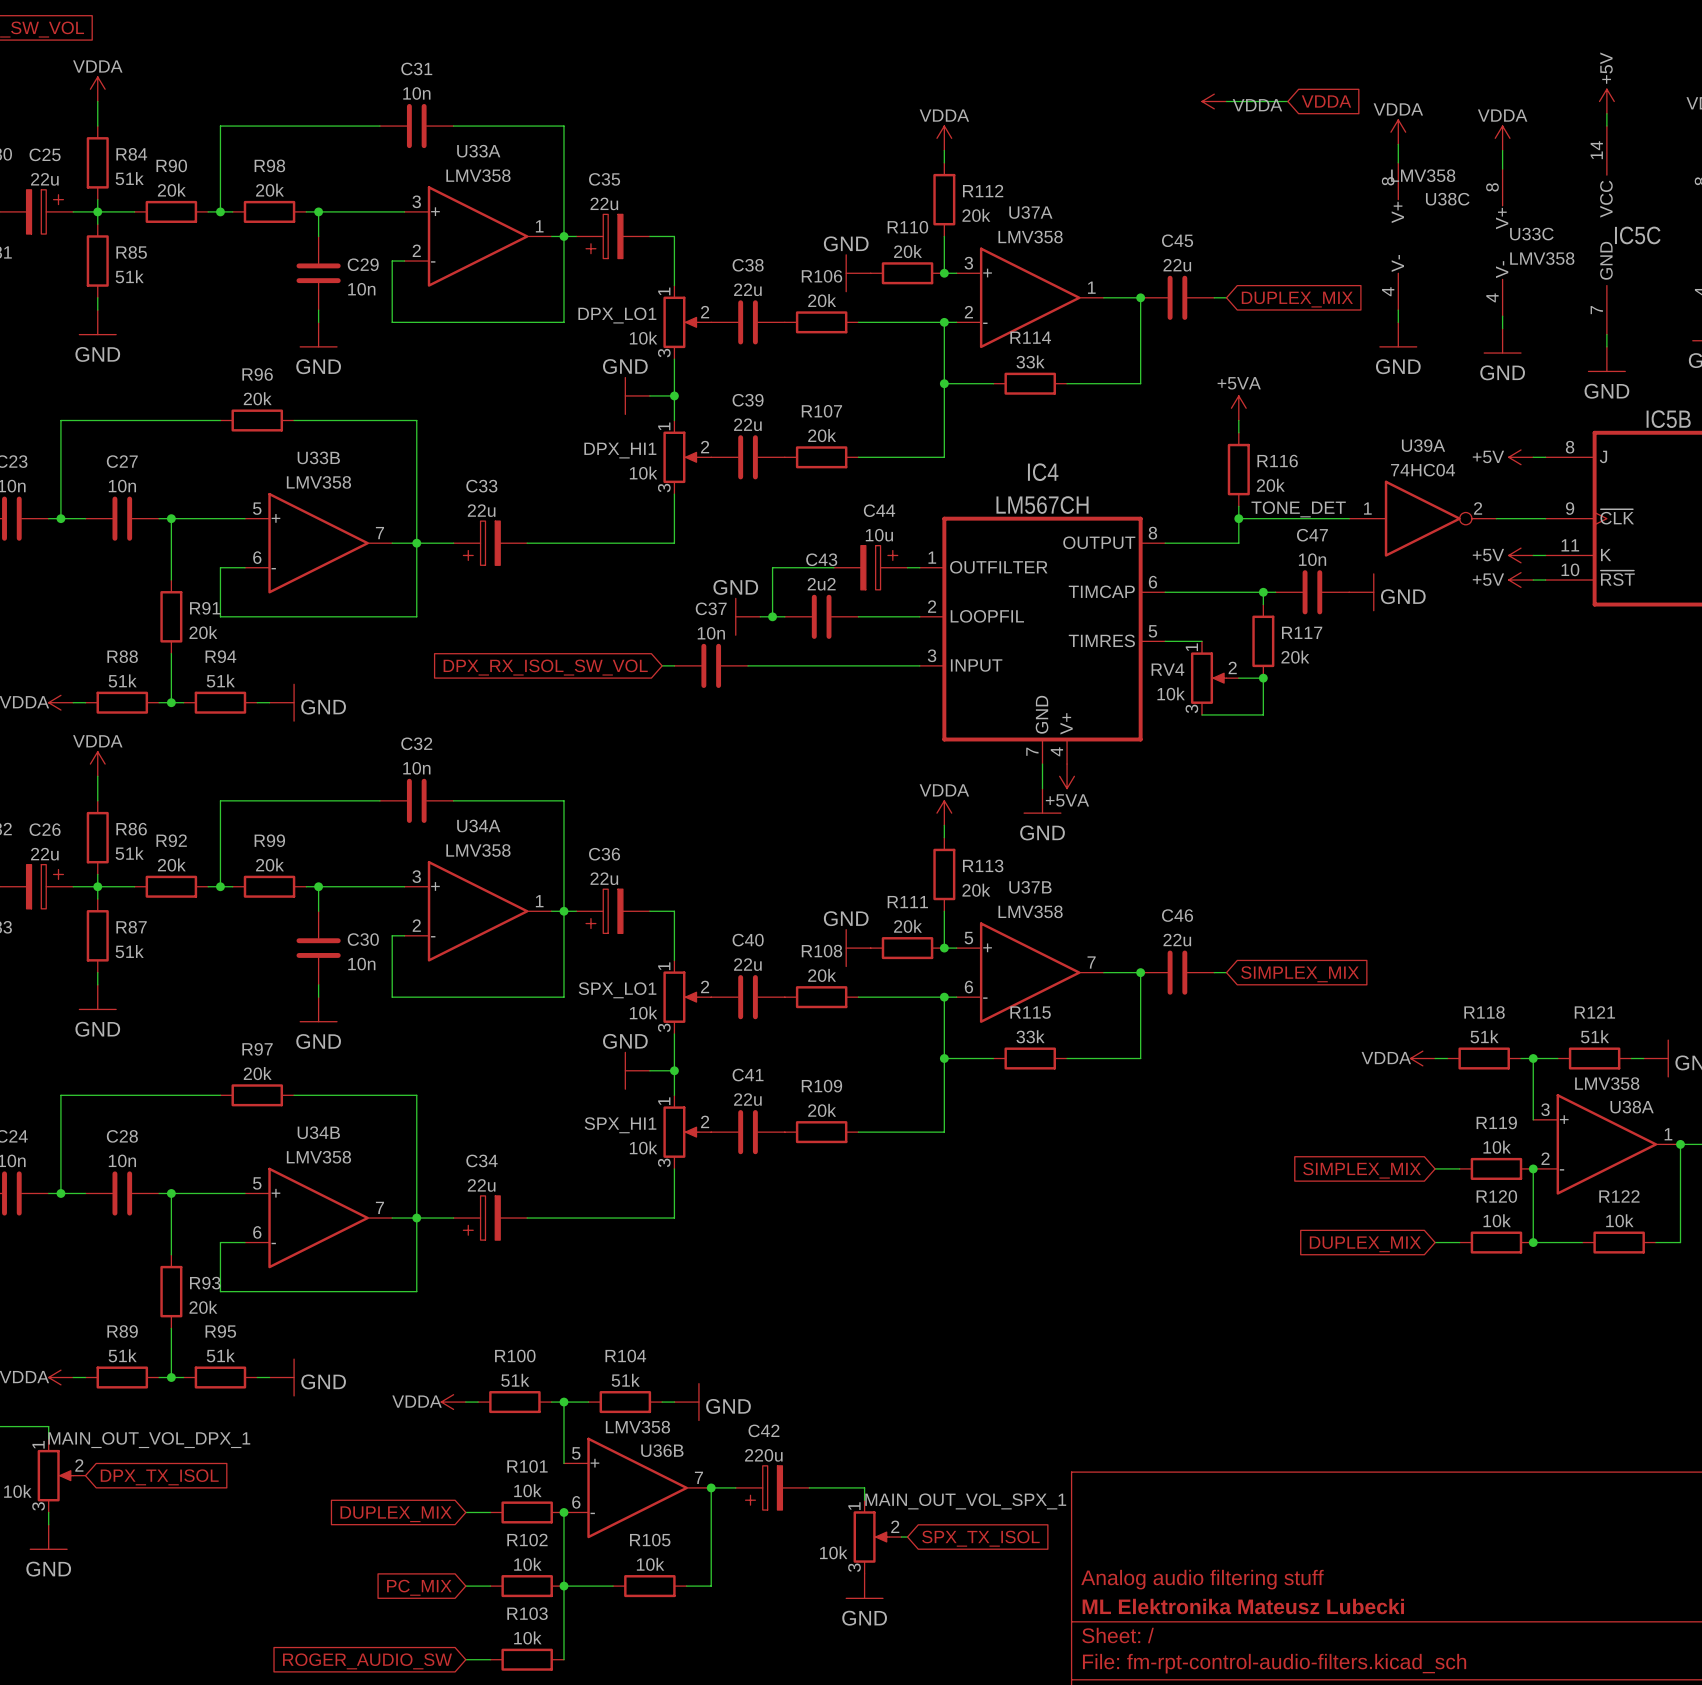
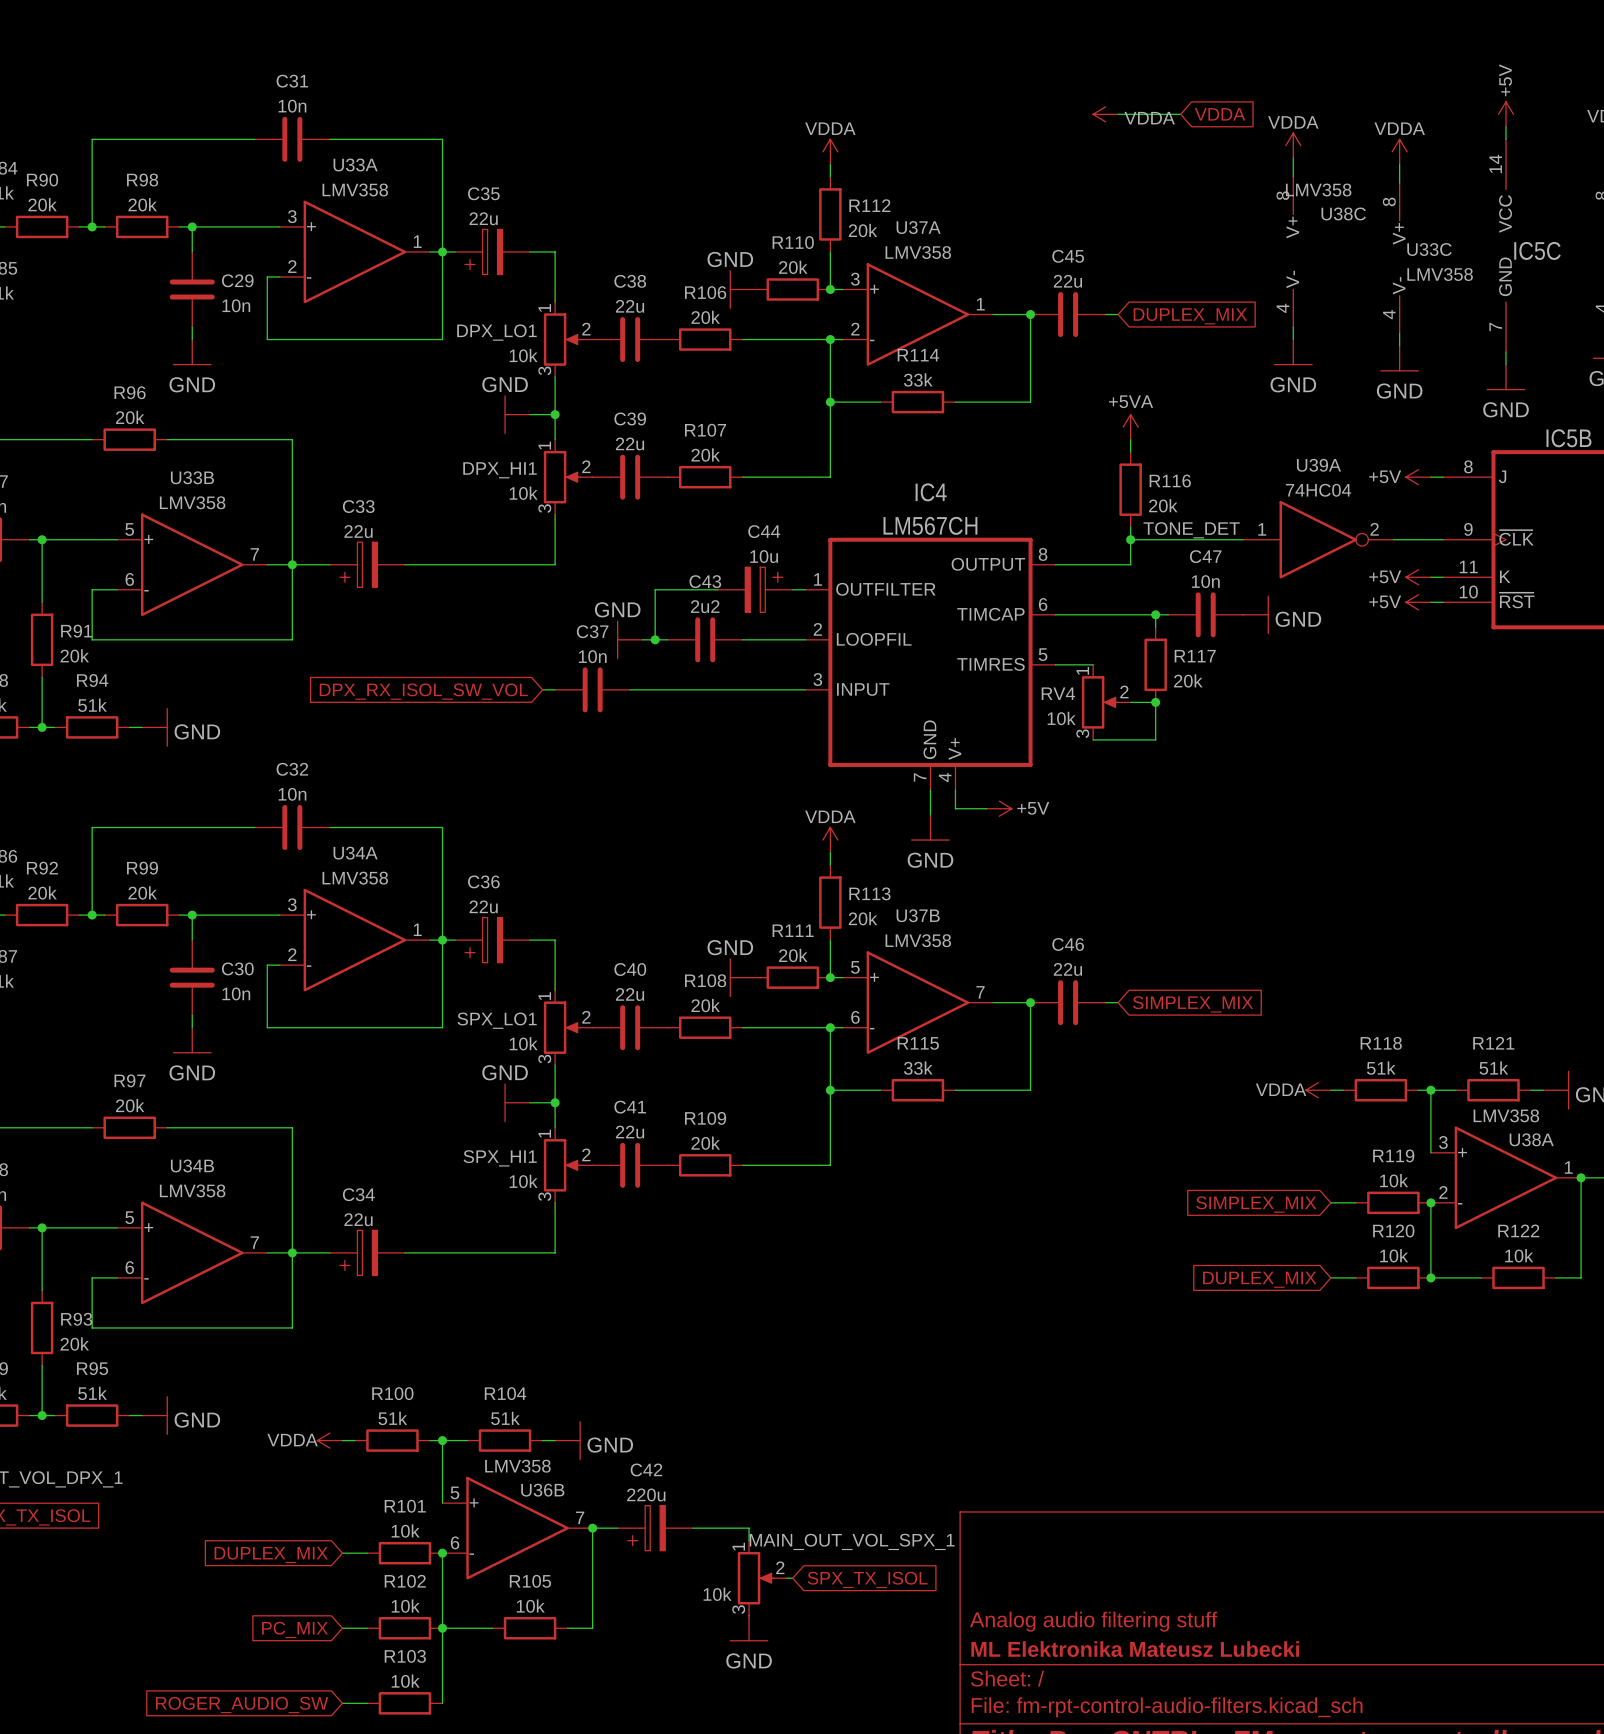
wire: none -> (955, 789) (955, 808) (986, 808)
power symbol: +5VA (1067, 776) -> none
power symbol: none -> +5V (999, 808)

